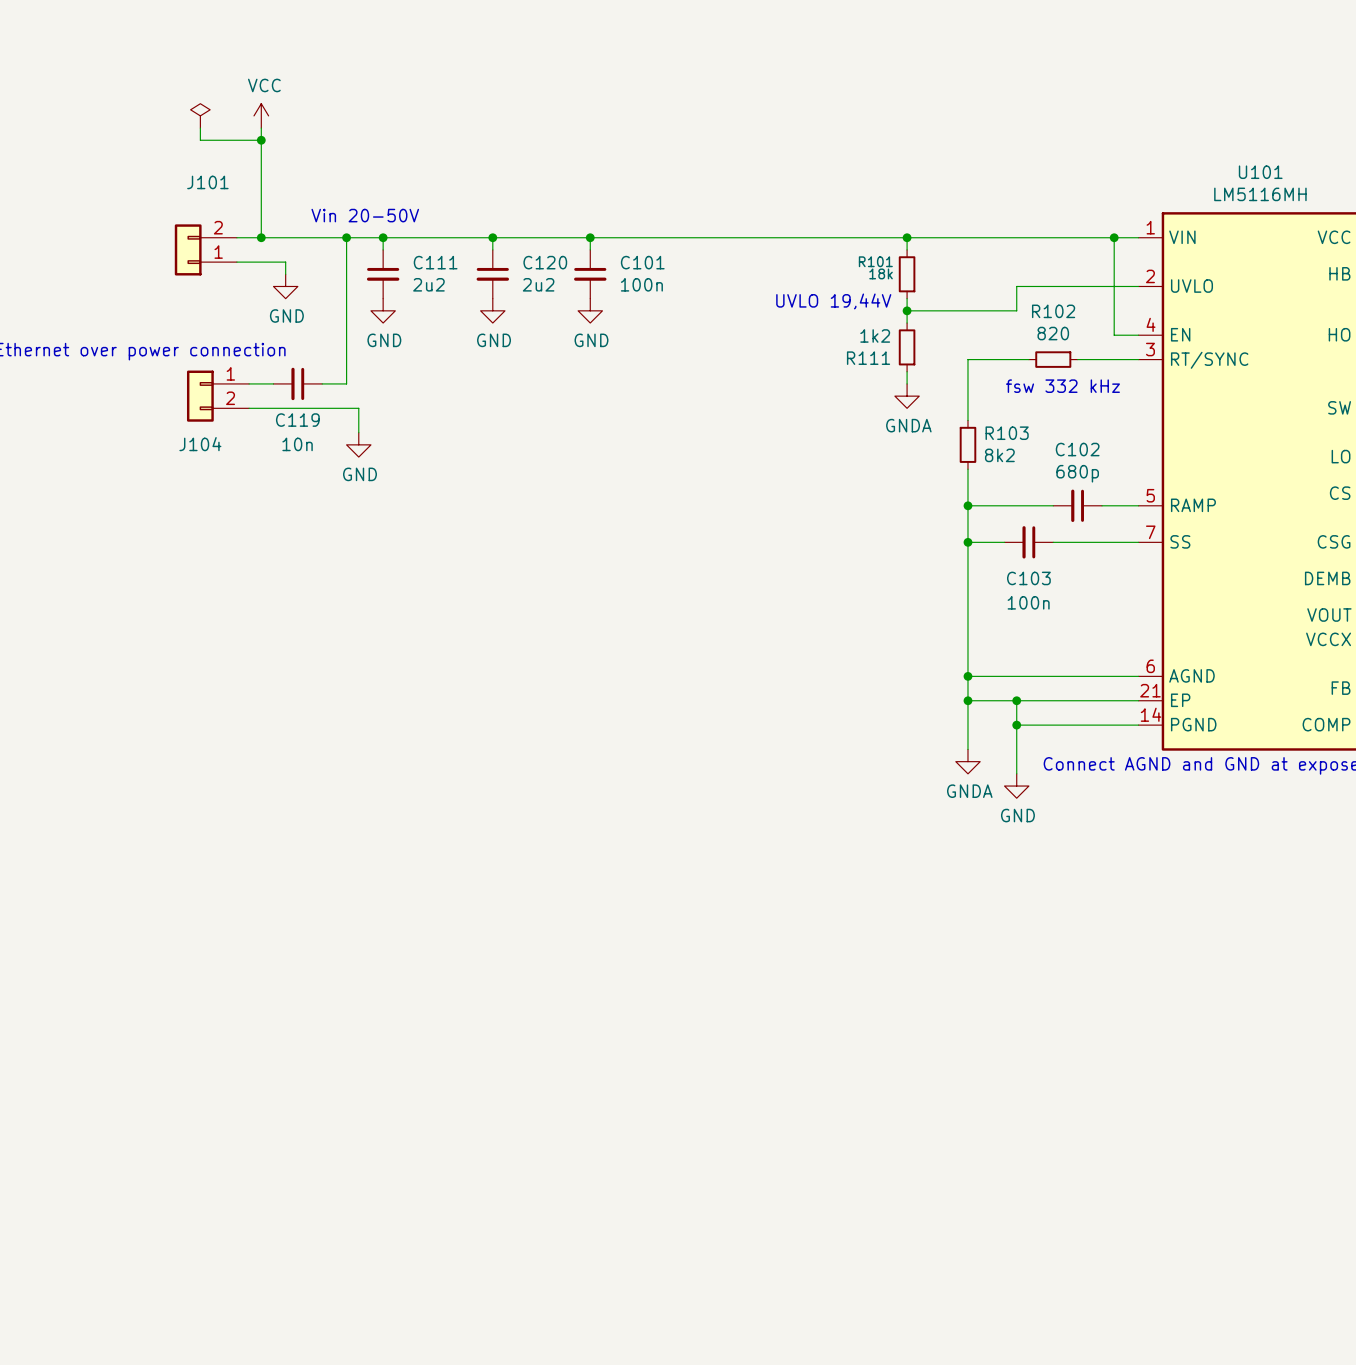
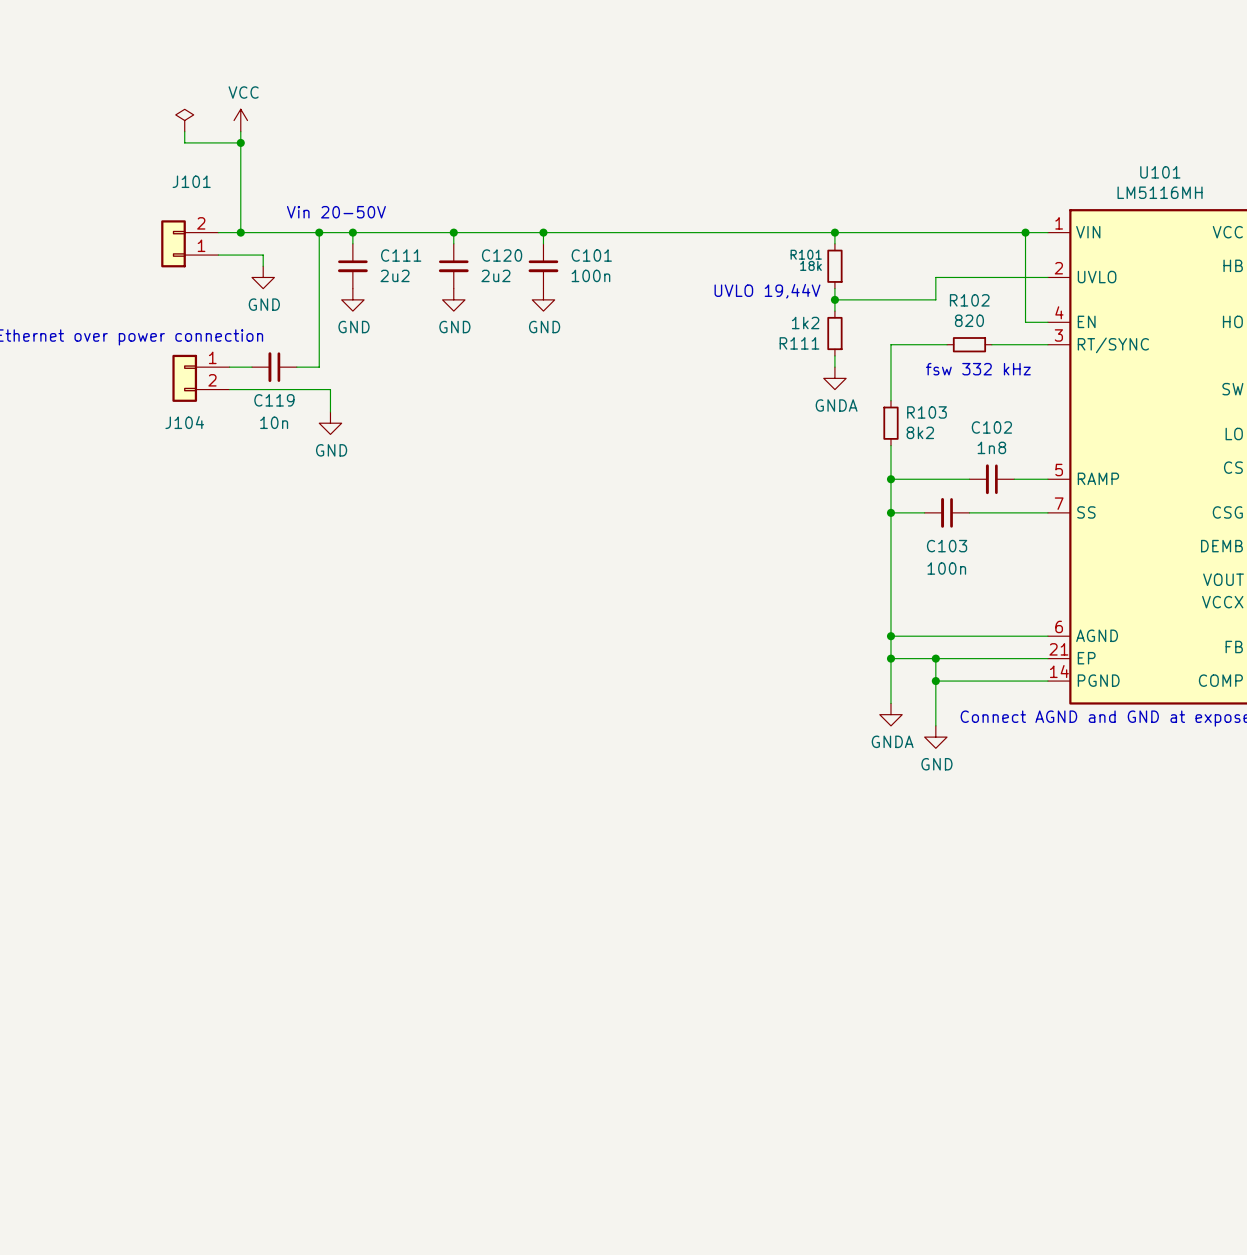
C102 value: 680p (1077, 473) -> 1n8 (991, 447)

